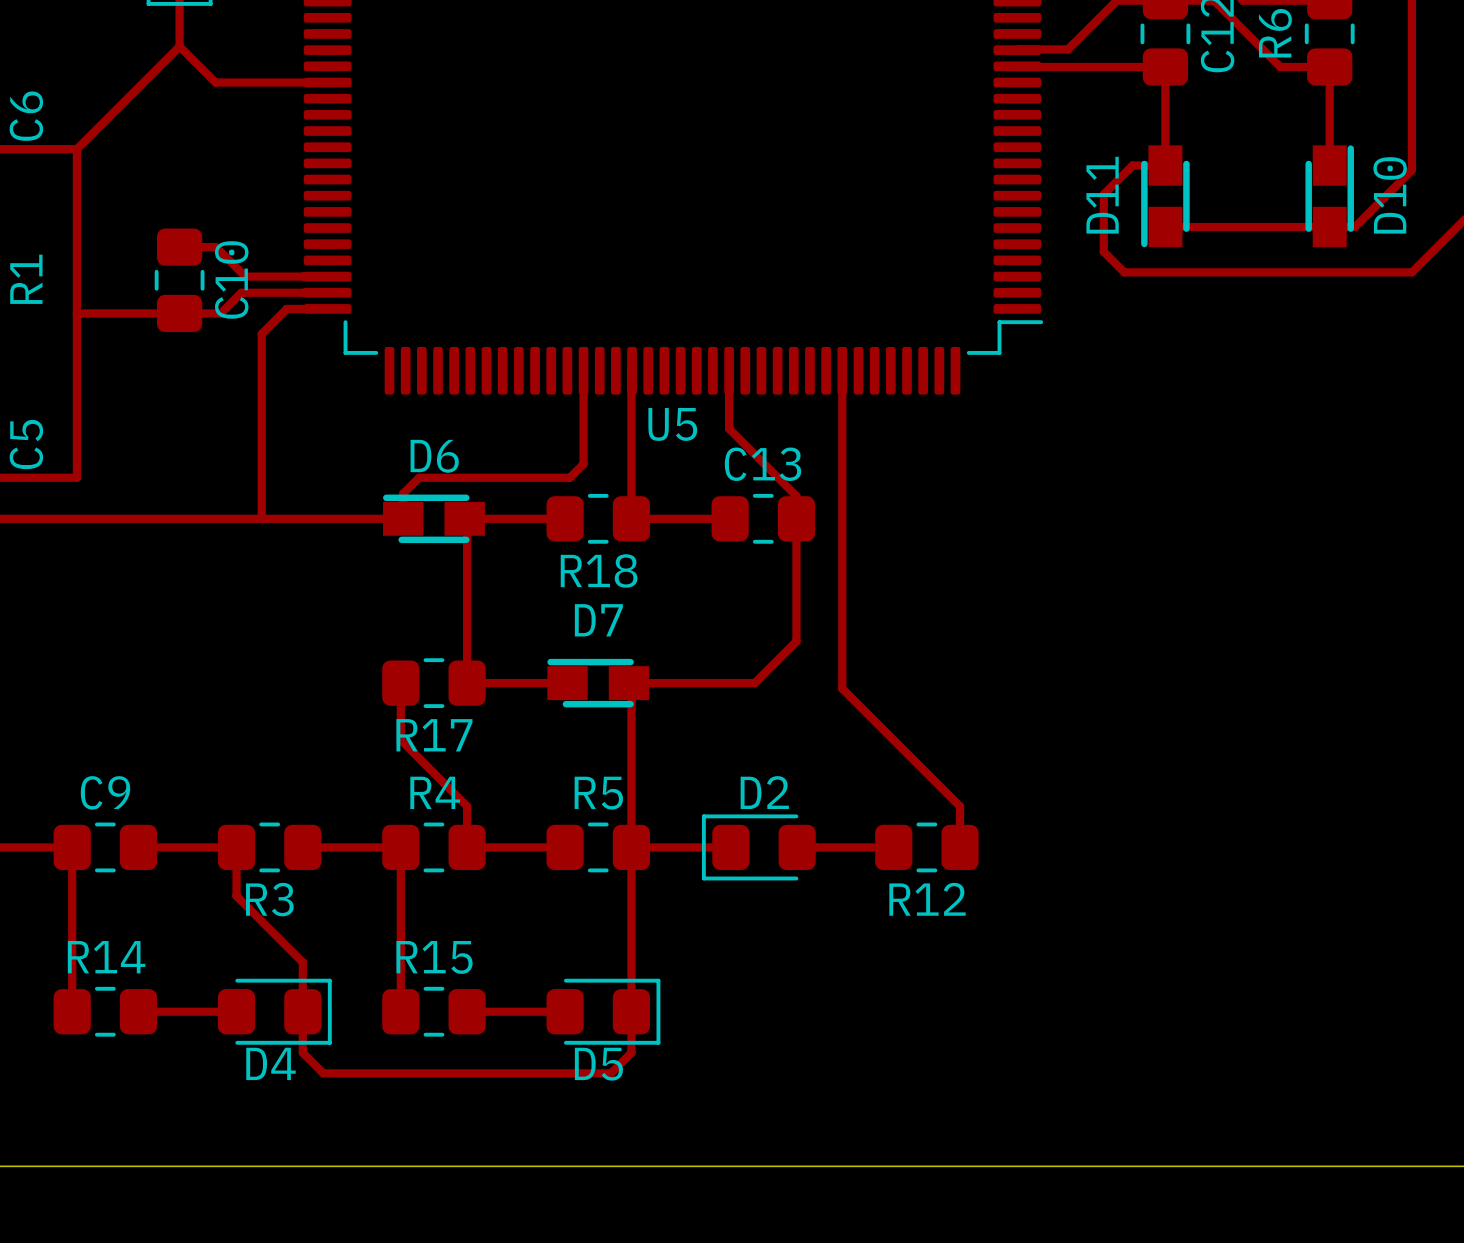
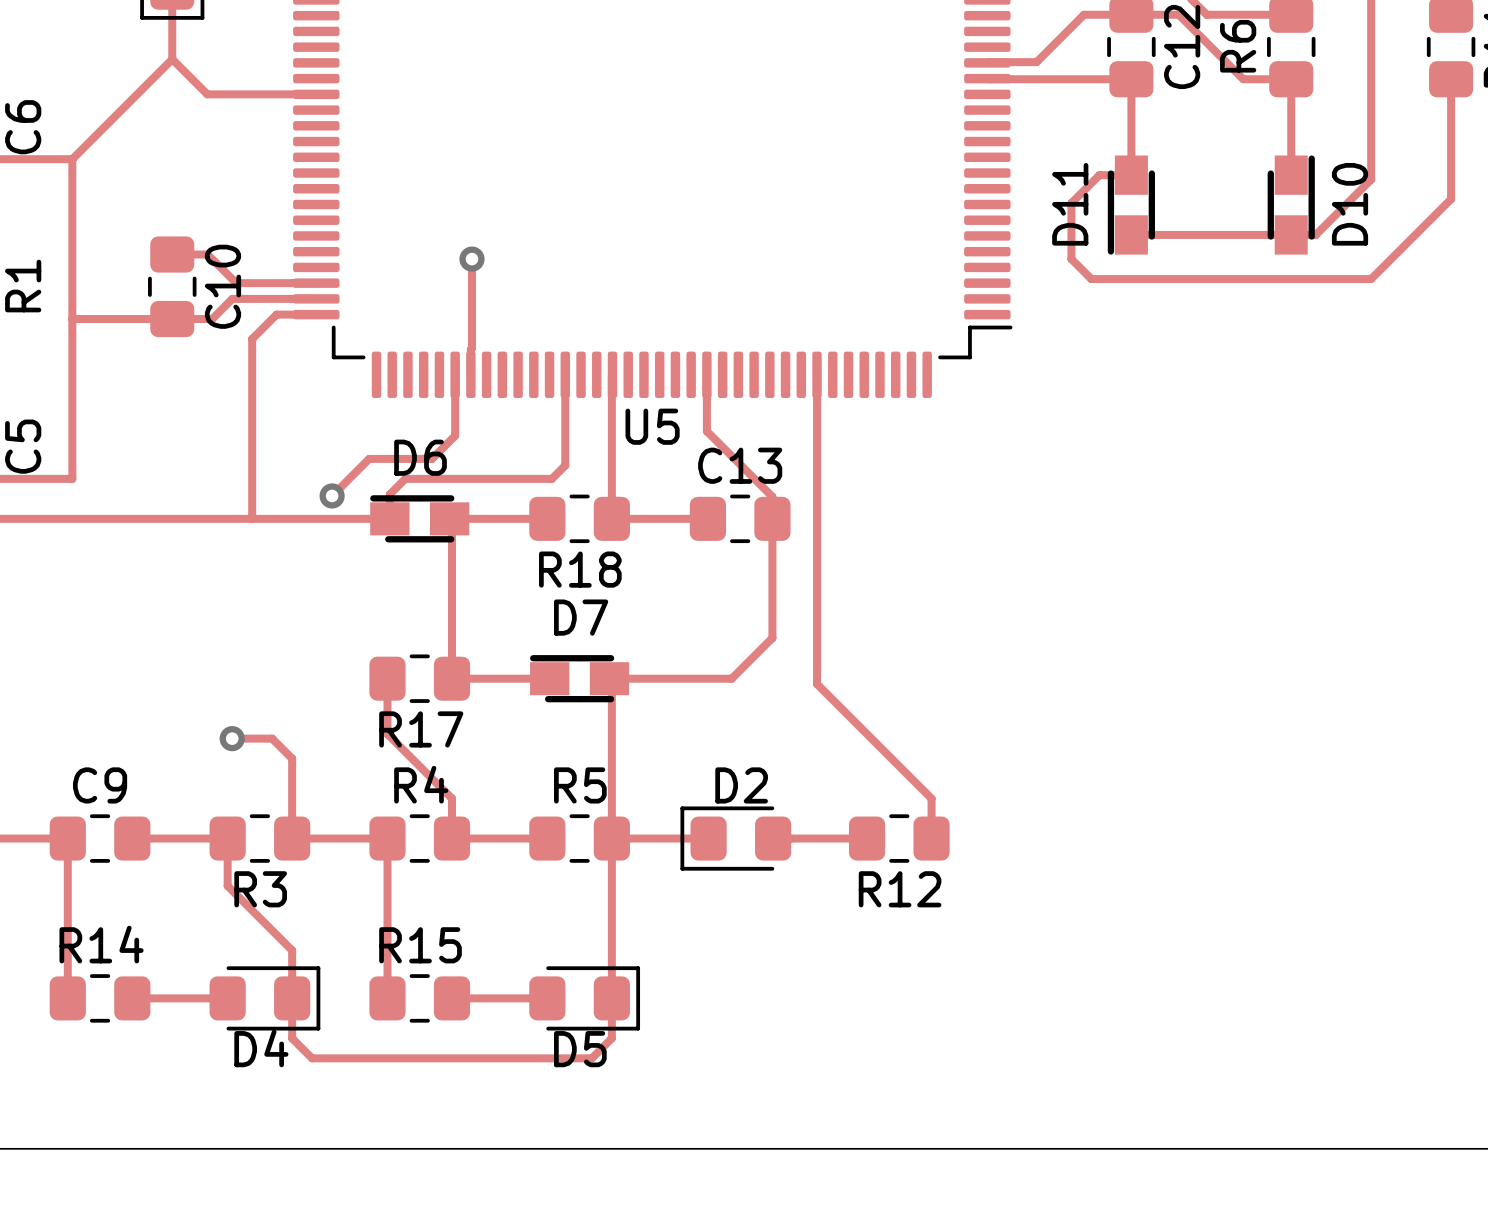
track: none -> (471, 259) (470, 374)
via: none -> (471, 259)
track: none -> (455, 374) (455, 435) (432, 458) (369, 458) (332, 495)
via: none -> (332, 495)
track: none -> (232, 738) (272, 738) (292, 758) (292, 838)
via: none -> (232, 738)

